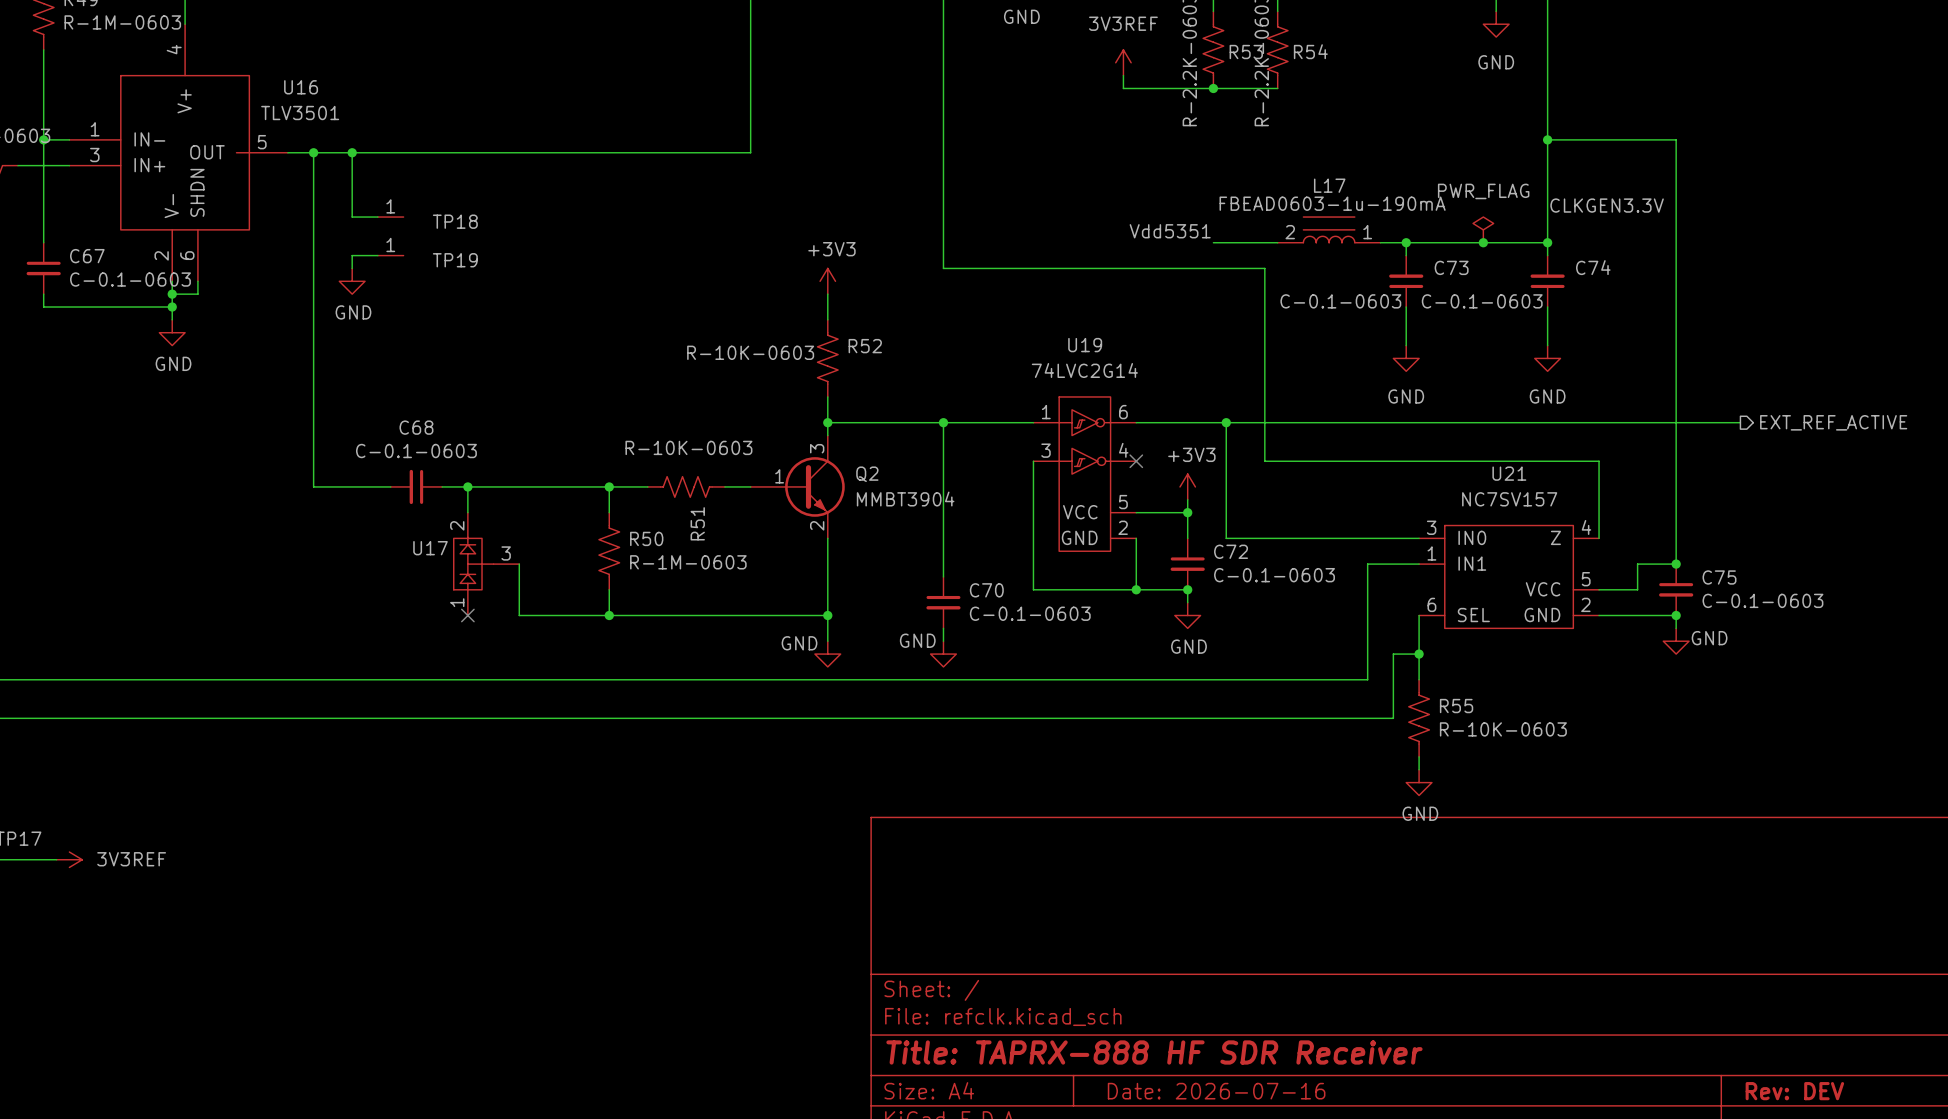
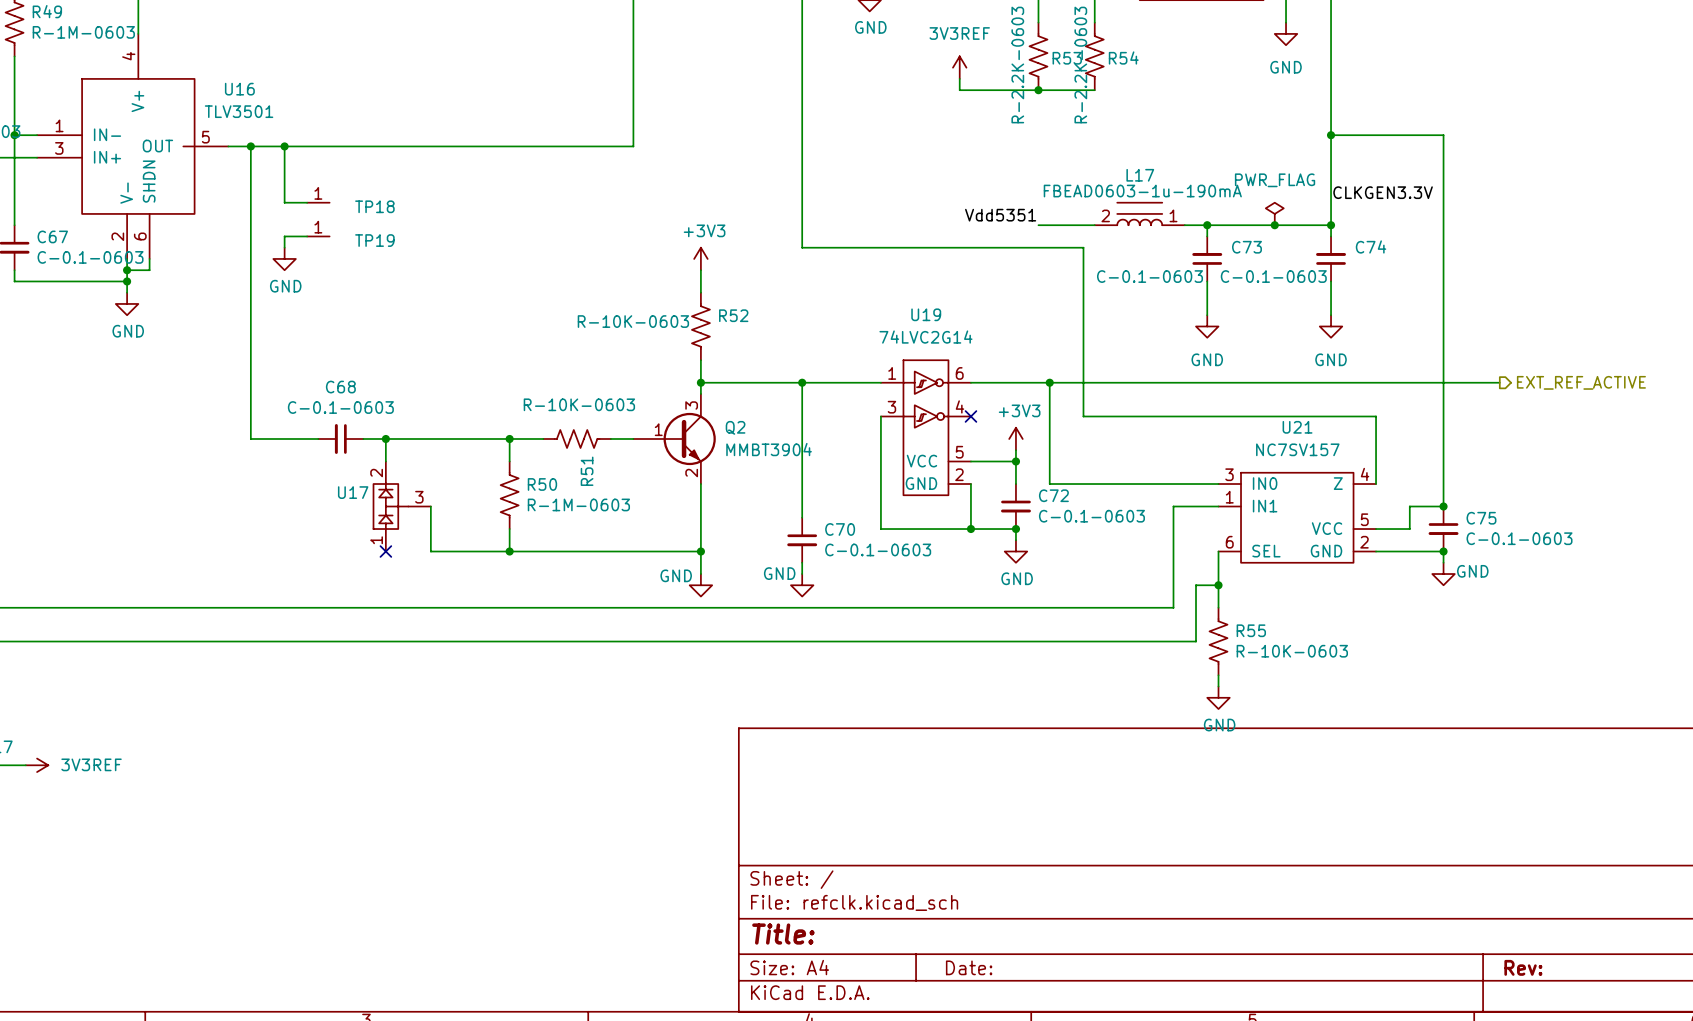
title block: Title: TAPRX-888 HF SDR Receiver (1154, 1052) -> Title: (783, 934)
title block: Date: 2026-07-16 (1216, 1091) -> Date: (969, 967)
title block: Rev: DEV (1794, 1091) -> Rev: (1523, 967)

